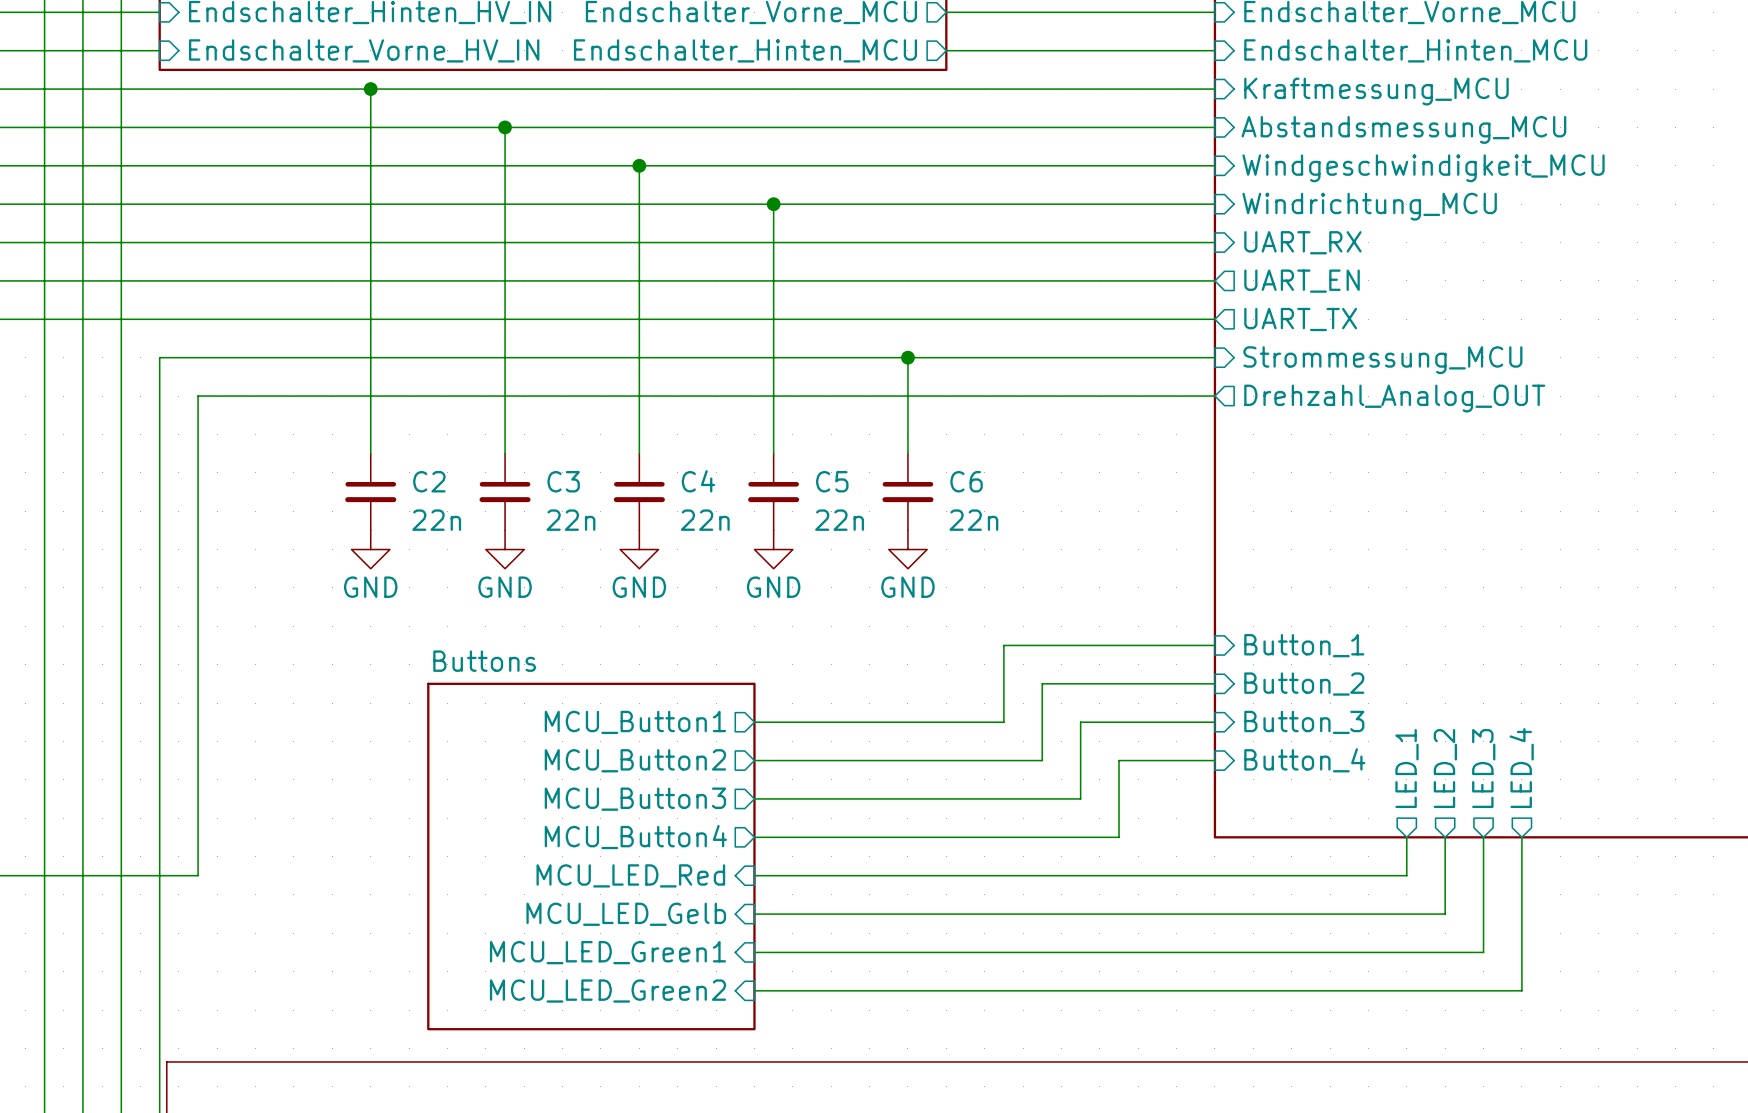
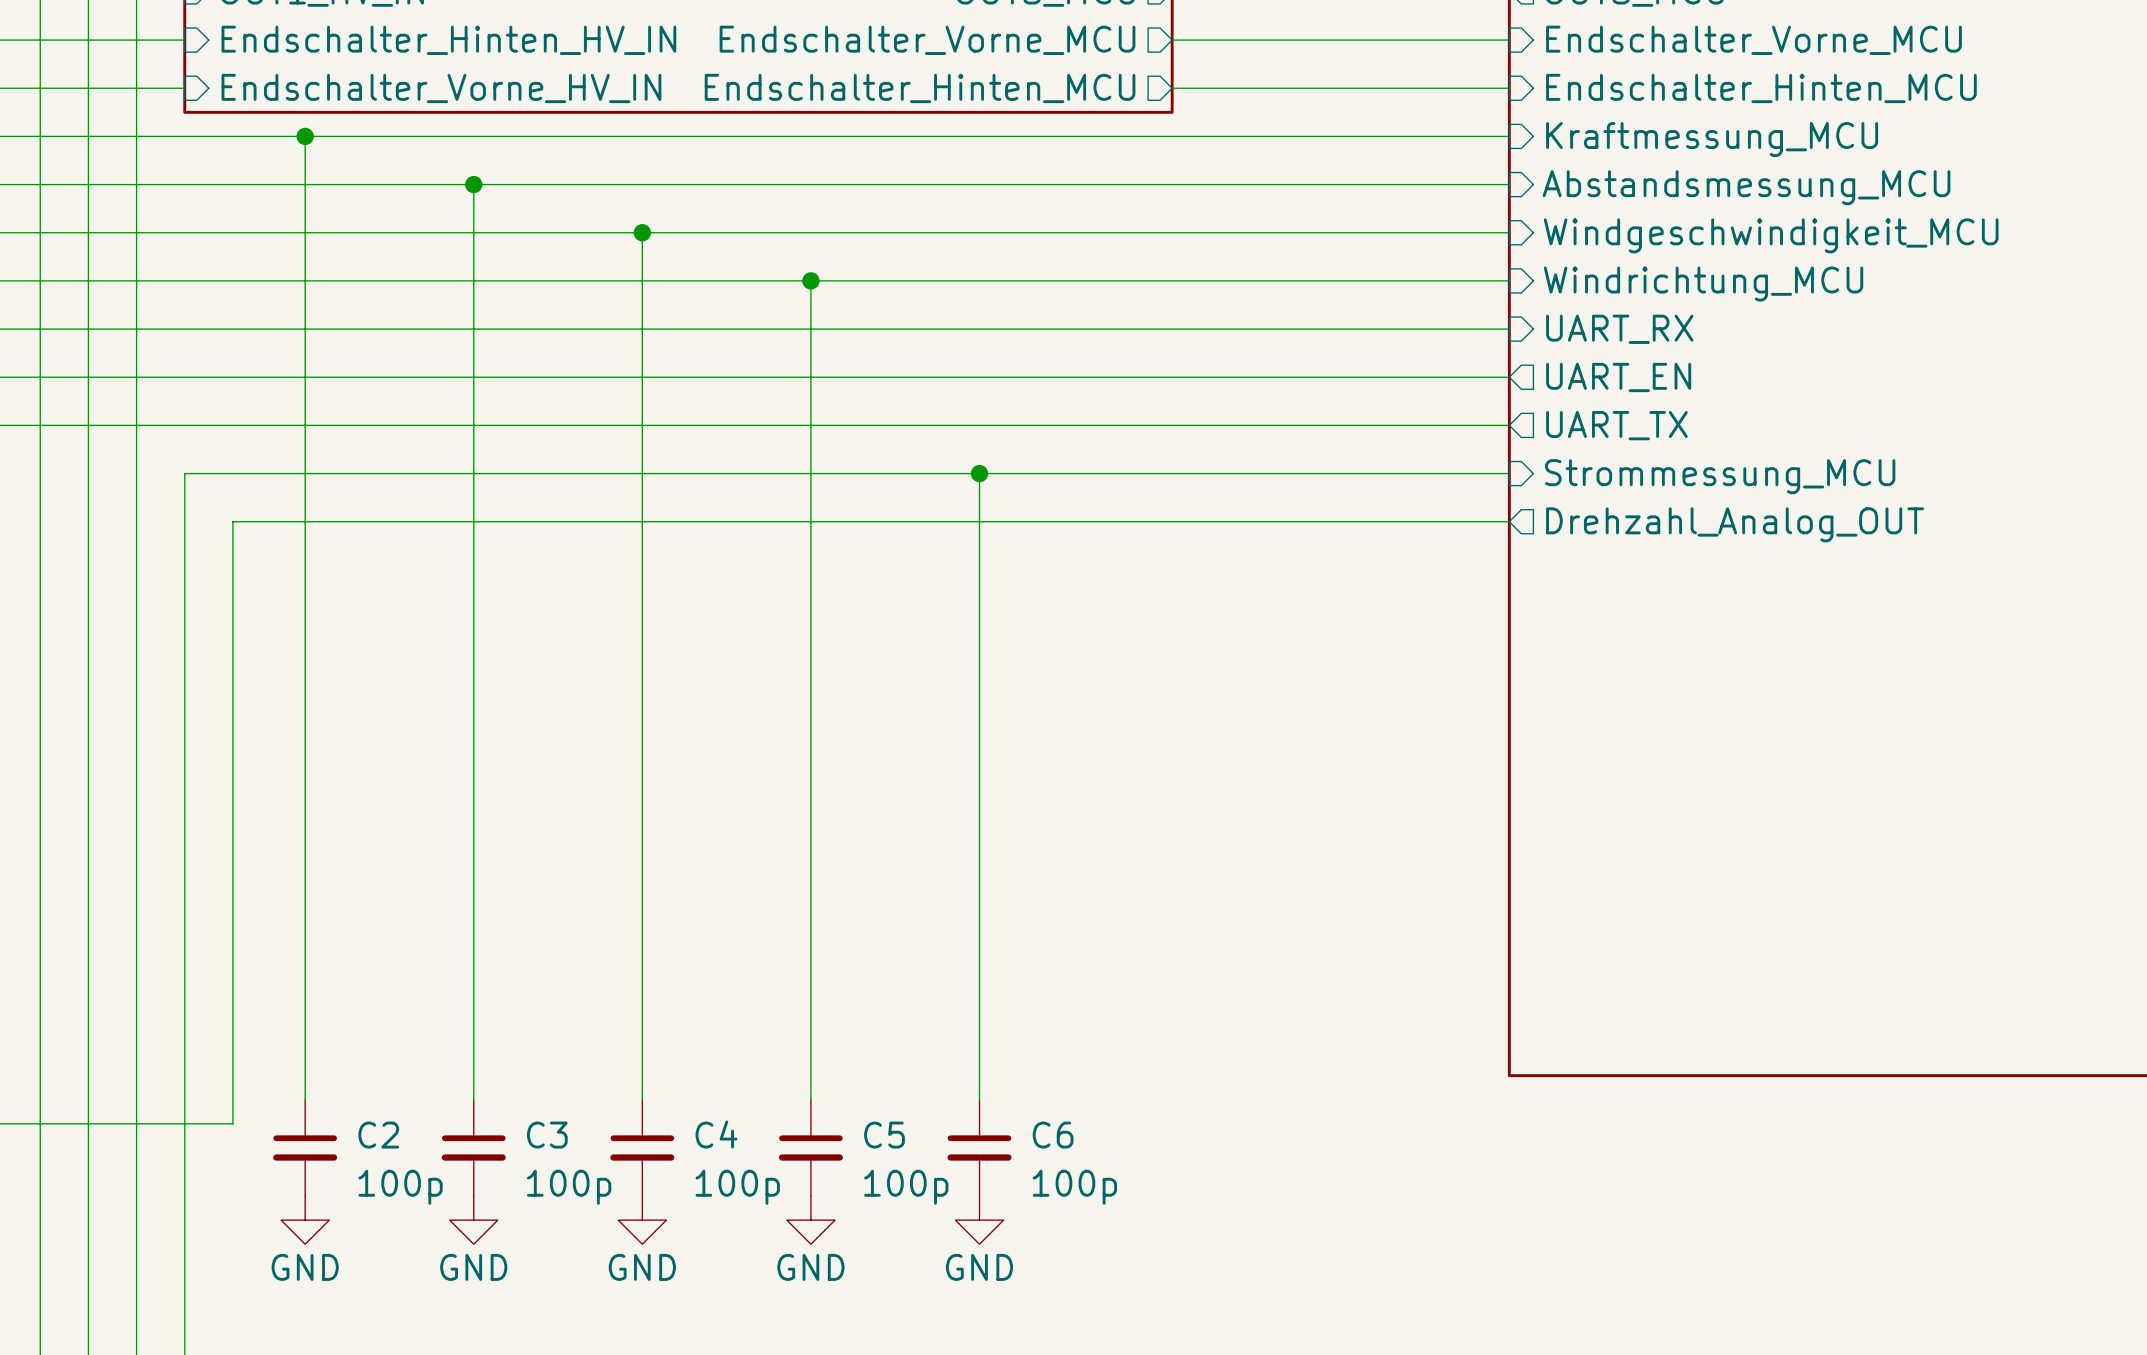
wire: none -> (305, 136) (305, 1099)
junction: none -> (305, 136)
wire: (370, 89) (370, 453) -> none
junction position: (370, 89) -> (473, 184)
wire: none -> (473, 184) (473, 1099)
wire: (505, 127) (505, 453) -> none
junction position: (505, 127) -> (642, 232)
wire: none -> (642, 232) (642, 1099)
wire: (639, 165) (639, 453) -> none
junction position: (639, 165) -> (810, 280)
wire: none -> (810, 280) (810, 1099)
wire: (773, 204) (773, 453) -> none
junction: (773, 204) -> none
wire: none -> (979, 473) (979, 1099)
junction: none -> (979, 473)
wire: (907, 357) (907, 453) -> none
junction: (907, 357) -> none
C2 position: (370, 491) -> (305, 1147)
C3 position: (505, 491) -> (473, 1147)
C4 position: (639, 491) -> (642, 1147)
C5 position: (773, 491) -> (810, 1147)
C6 position: (907, 491) -> (979, 1147)
C2 value: 22n (436, 520) -> 100p (400, 1187)
C3 value: 22n (570, 520) -> 100p (569, 1187)
C4 value: 22n (705, 520) -> 100p (737, 1187)
C5 value: 22n (839, 520) -> 100p (906, 1187)
C6 value: 22n (973, 520) -> 100p (1074, 1187)
power symbol: GND (370, 549) -> none
power symbol: GND (505, 549) -> none
power symbol: GND (639, 549) -> none
power symbol: GND (773, 549) -> none
power symbol: GND (907, 549) -> none
wire: (1214, 645) (1003, 645) (1003, 722) (754, 722) -> none
sheet pin: Button_1 (1304, 645) -> none
wire: (1214, 683) (1042, 683) (1042, 760) (754, 760) -> none
sheet pin: Button_2 (1304, 684) -> none
sheet pin: MCU_Button1 (635, 722) -> none
wire: (1214, 722) (1080, 722) (1080, 798) (754, 798) -> none
sheet pin: Button_3 (1304, 722) -> none
sheet pin: MCU_Button2 (635, 760) -> none
wire: (1214, 760) (1119, 760) (1119, 837) (754, 837) -> none
sheet pin: Button_4 (1304, 760) -> none
sheet pin: LED_1 (1406, 768) -> none
sheet pin: LED_2 (1445, 768) -> none
sheet pin: LED_3 (1483, 768) -> none
sheet pin: LED_4 (1521, 768) -> none
sheet pin: MCU_Button3 (635, 799) -> none
sheet pin: MCU_Button4 (635, 837) -> none
wire: (1406, 837) (1406, 875) (754, 875) -> none
wire: (1445, 837) (1445, 914) (754, 914) -> none
wire: (1483, 837) (1483, 952) (754, 952) -> none
wire: (1521, 837) (1521, 990) (754, 990) -> none
sheet Buttons: (591, 856) -> none
sheet pin: MCU_LED_Red (630, 875) -> none
sheet pin: MCU_LED_Gelb (626, 914) -> none
power symbol: none -> GND (305, 1220)
power symbol: none -> GND (473, 1220)
power symbol: none -> GND (642, 1220)
sheet pin: MCU_LED_Green1 (607, 952) -> none
power symbol: none -> GND (810, 1220)
power symbol: none -> GND (979, 1220)
sheet pin: MCU_LED_Green2 (607, 991) -> none

